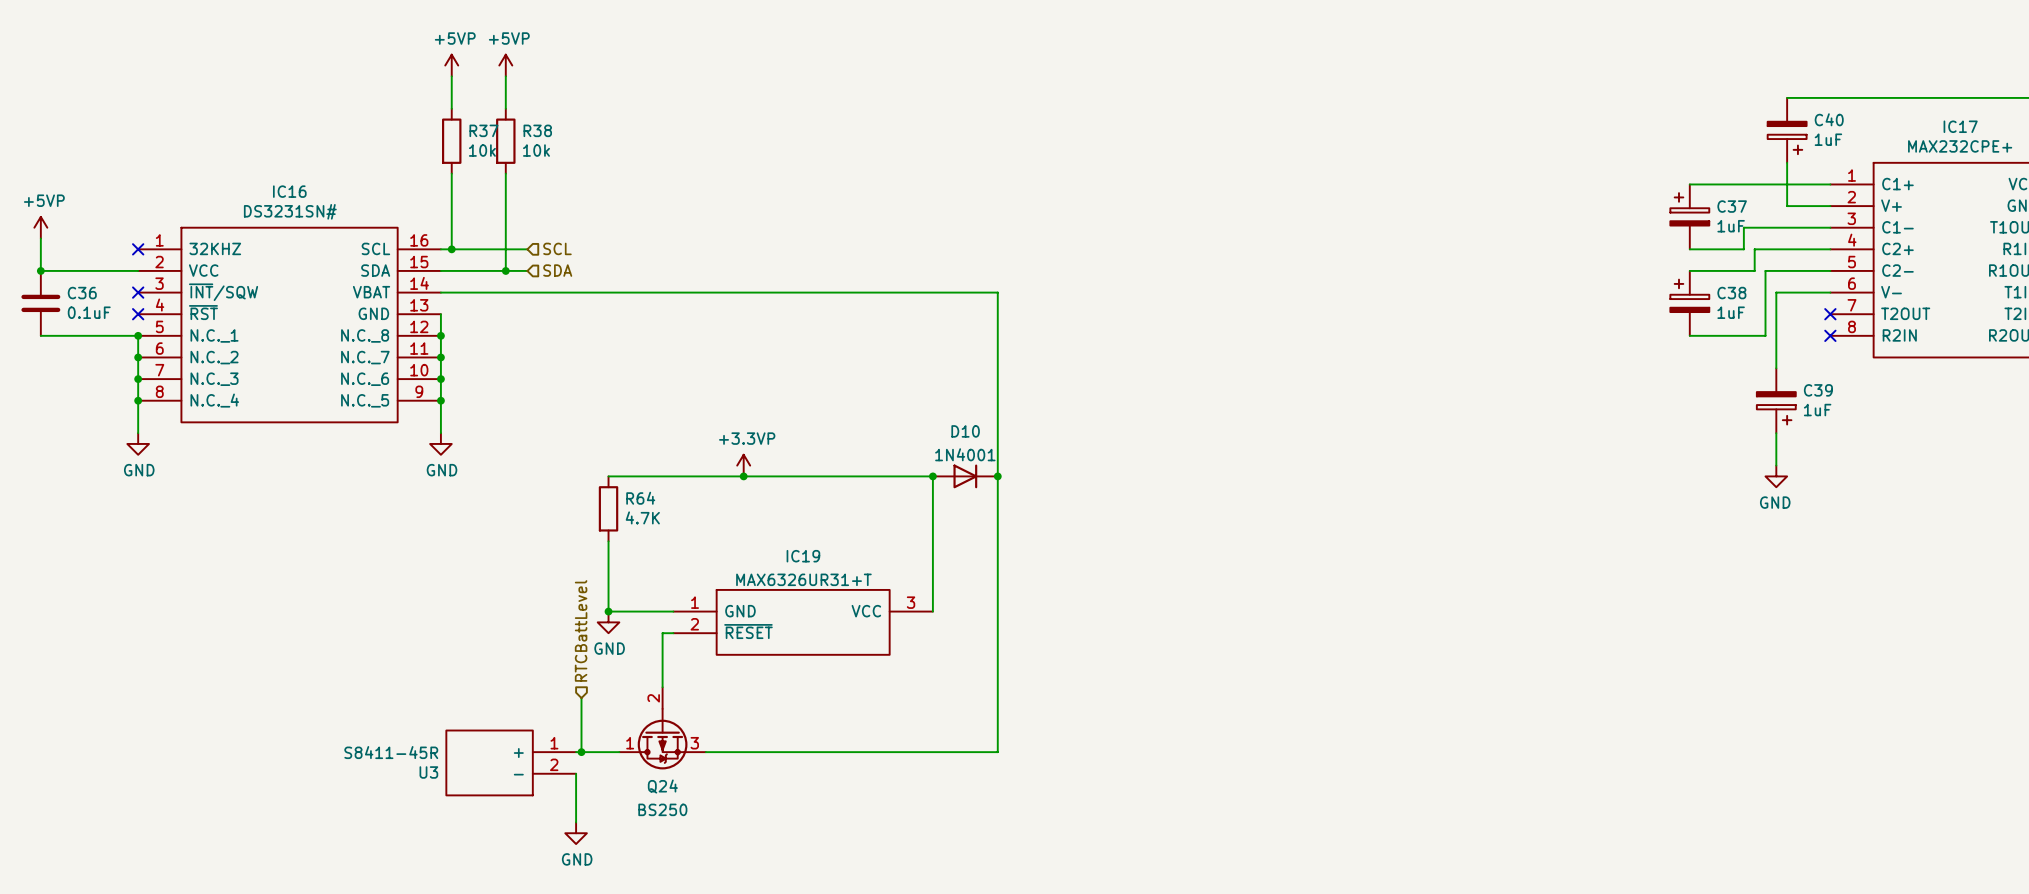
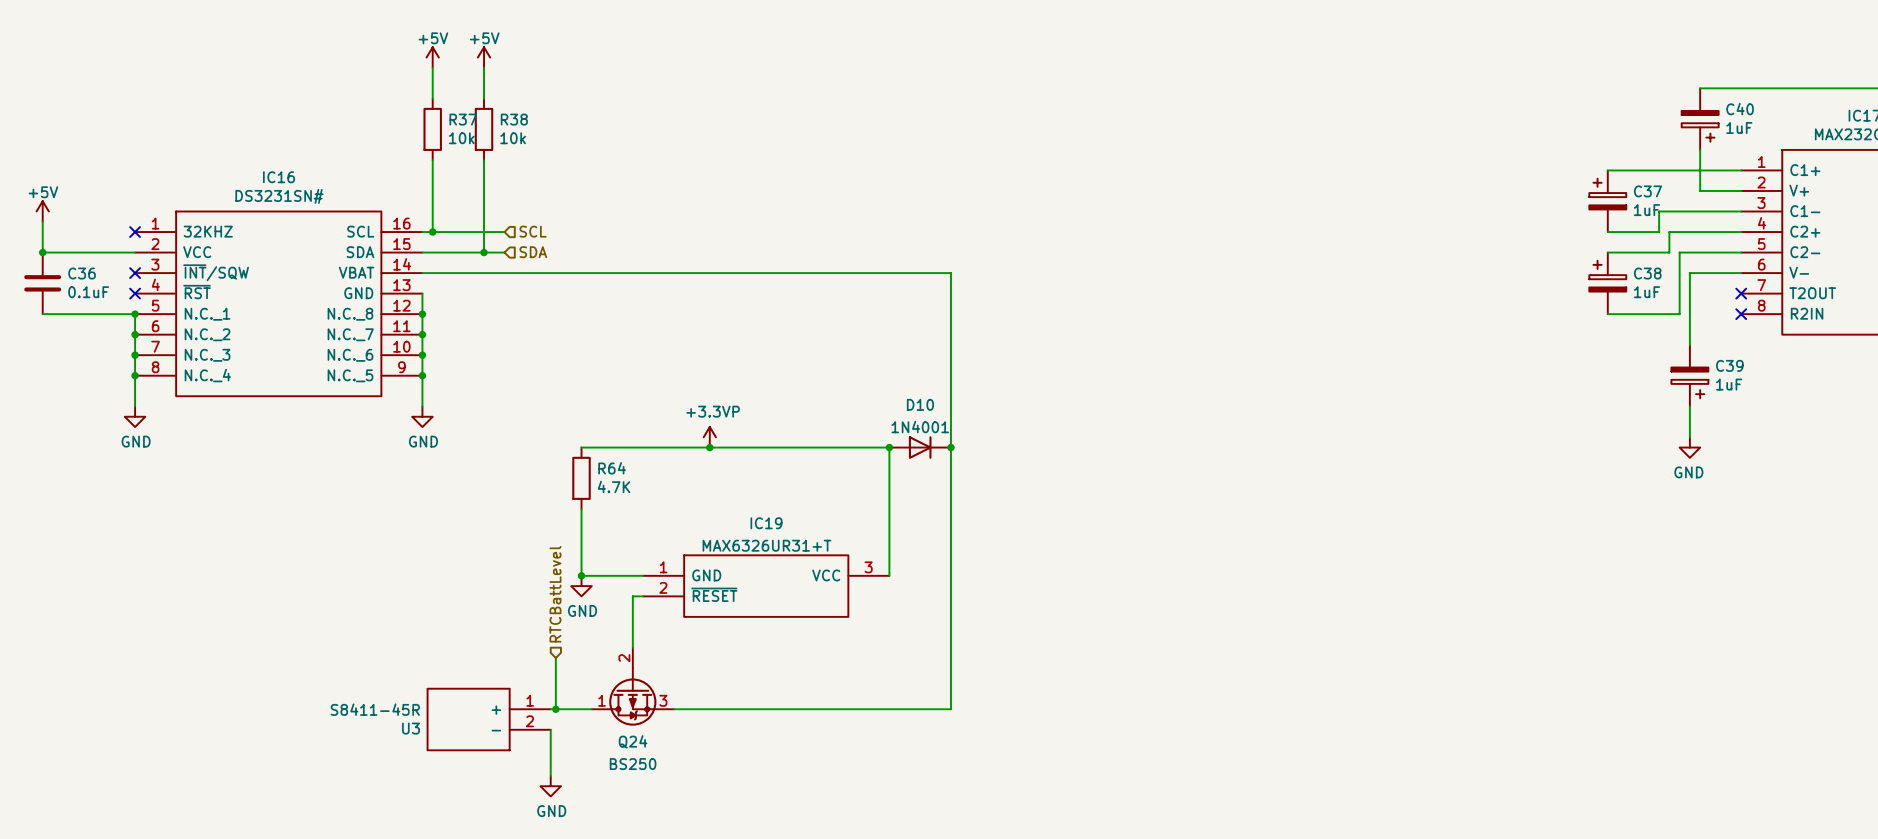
power symbol: +5VP (451, 65) -> +5V (432, 57)
power symbol: +5VP (505, 65) -> +5V (484, 57)
power symbol: +5VP (40, 227) -> +5V (42, 211)

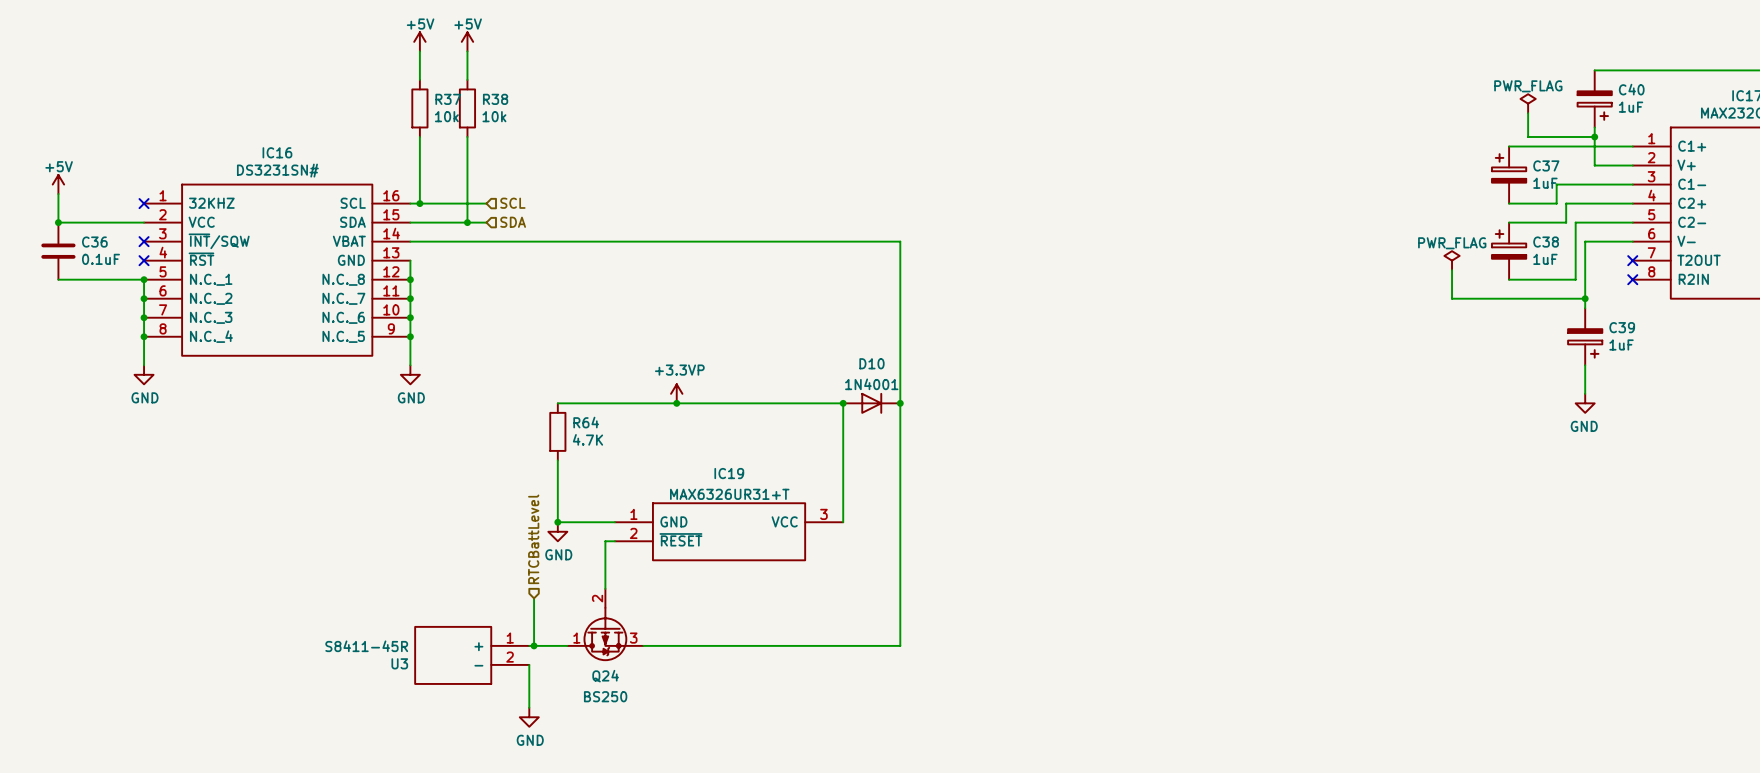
power symbol: none -> PWR_FLAG (1528, 103)
wire: none -> (1528, 113) (1528, 136) (1594, 136)
junction: none -> (1594, 136)
power symbol: none -> PWR_FLAG (1452, 260)
wire: none -> (1452, 270) (1452, 298) (1585, 298)
junction: none -> (1585, 298)

